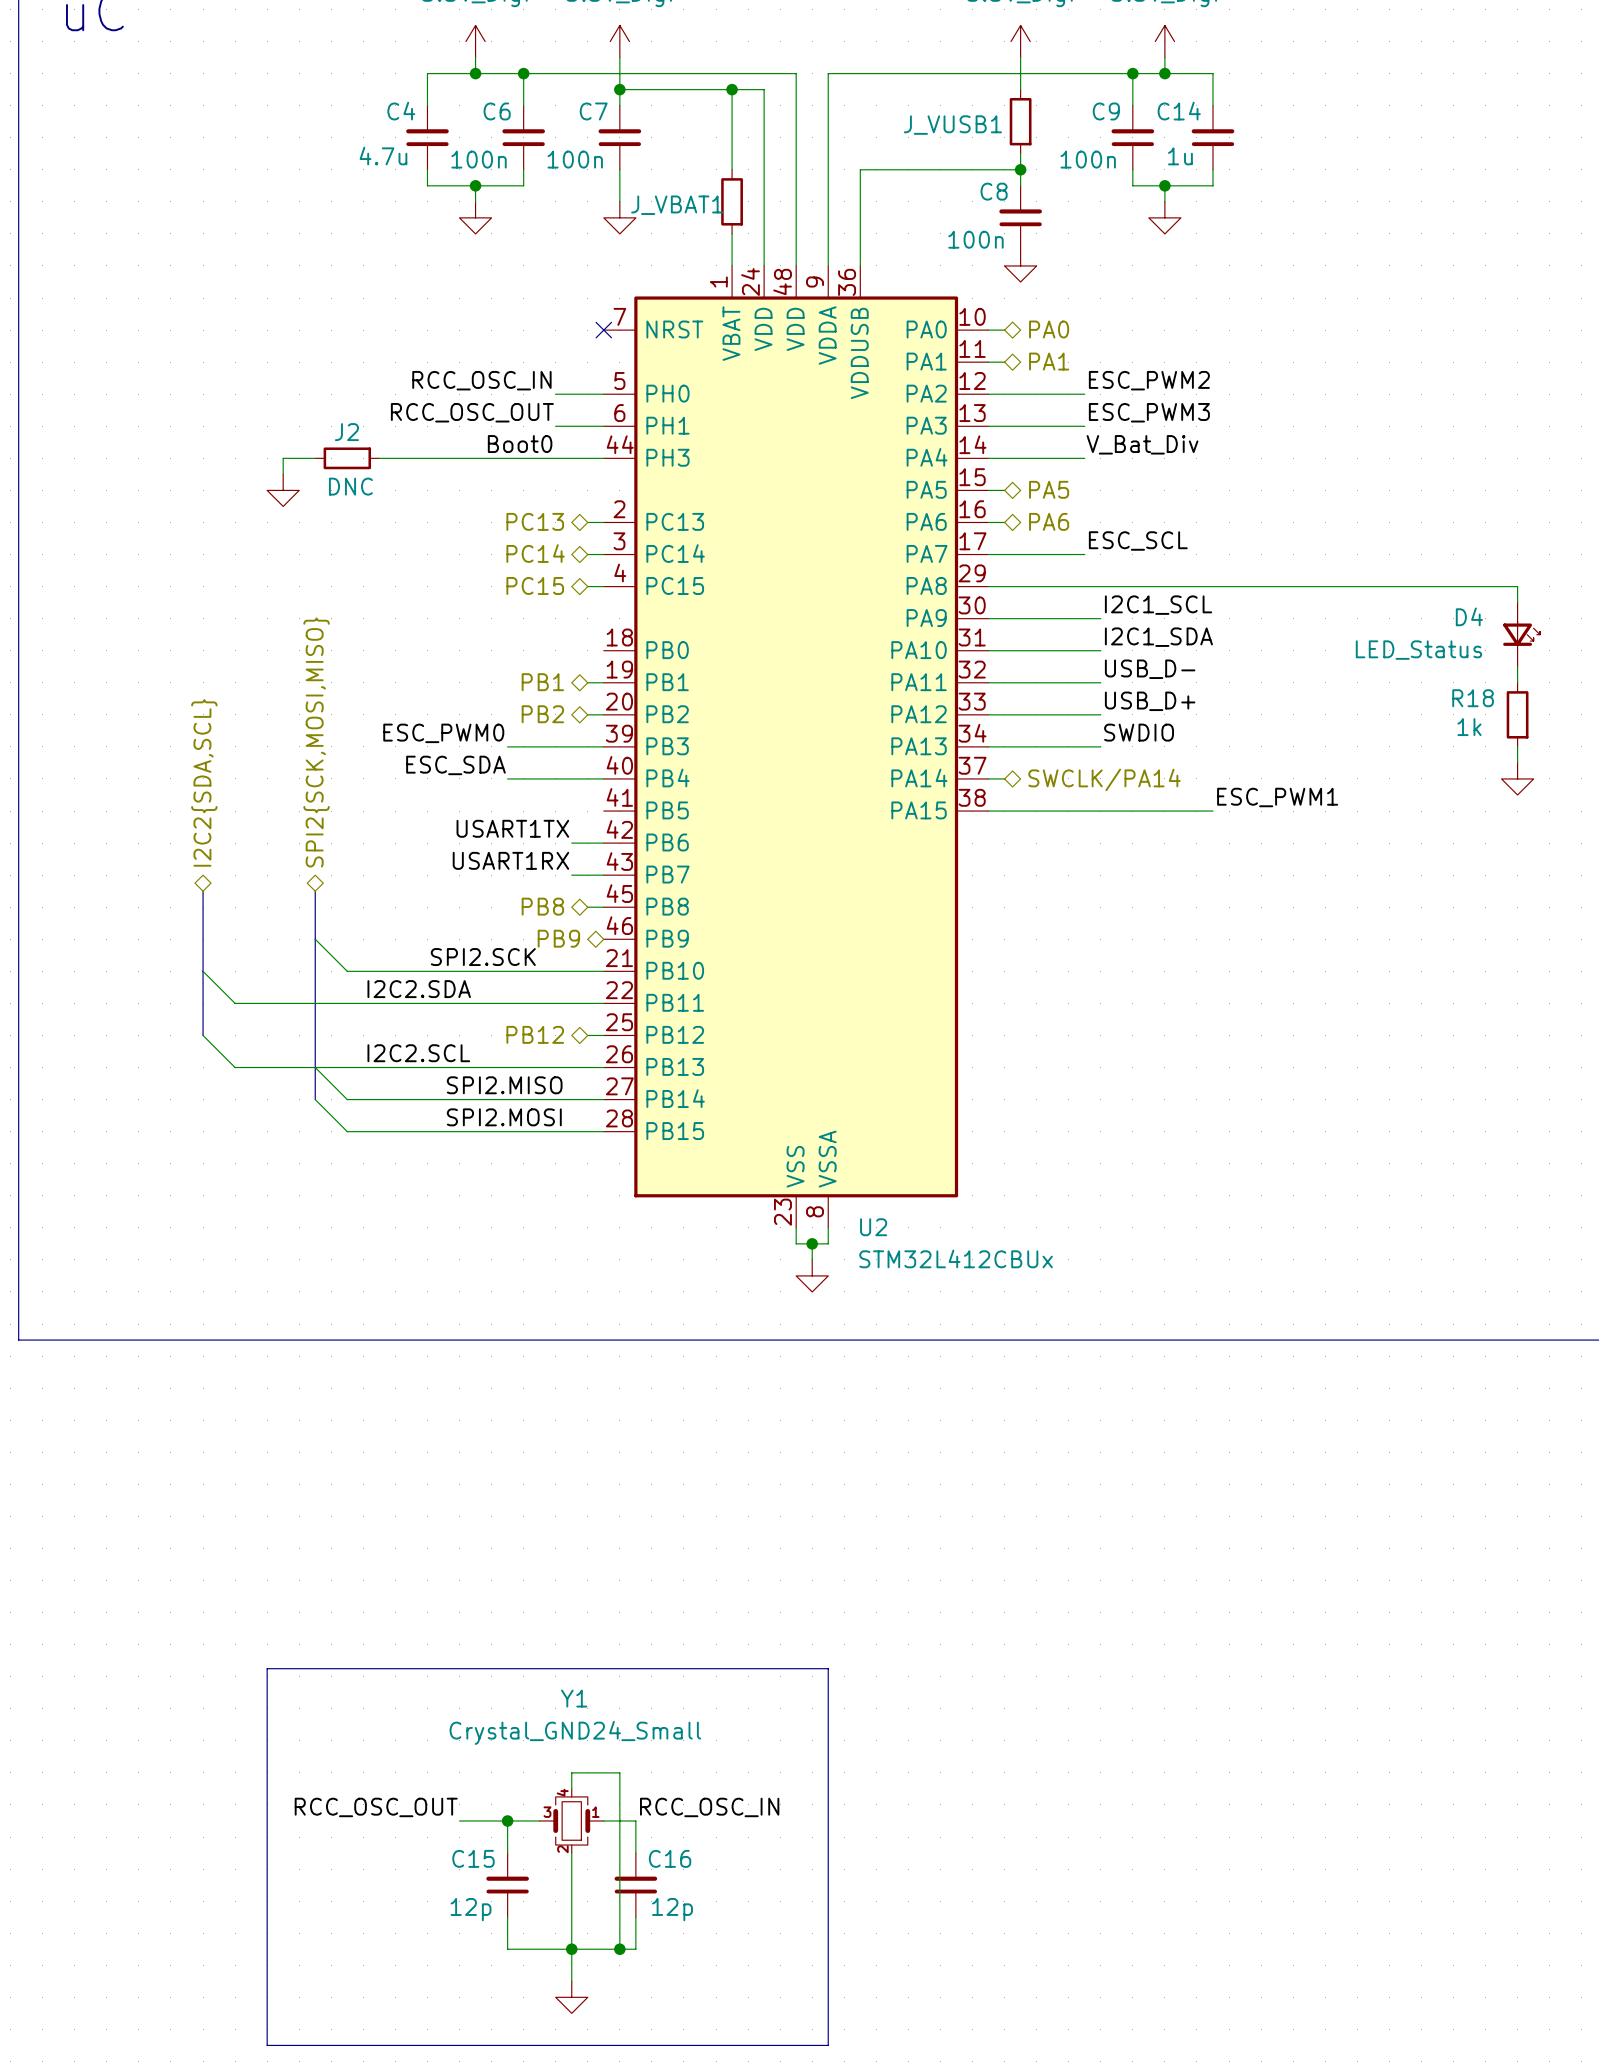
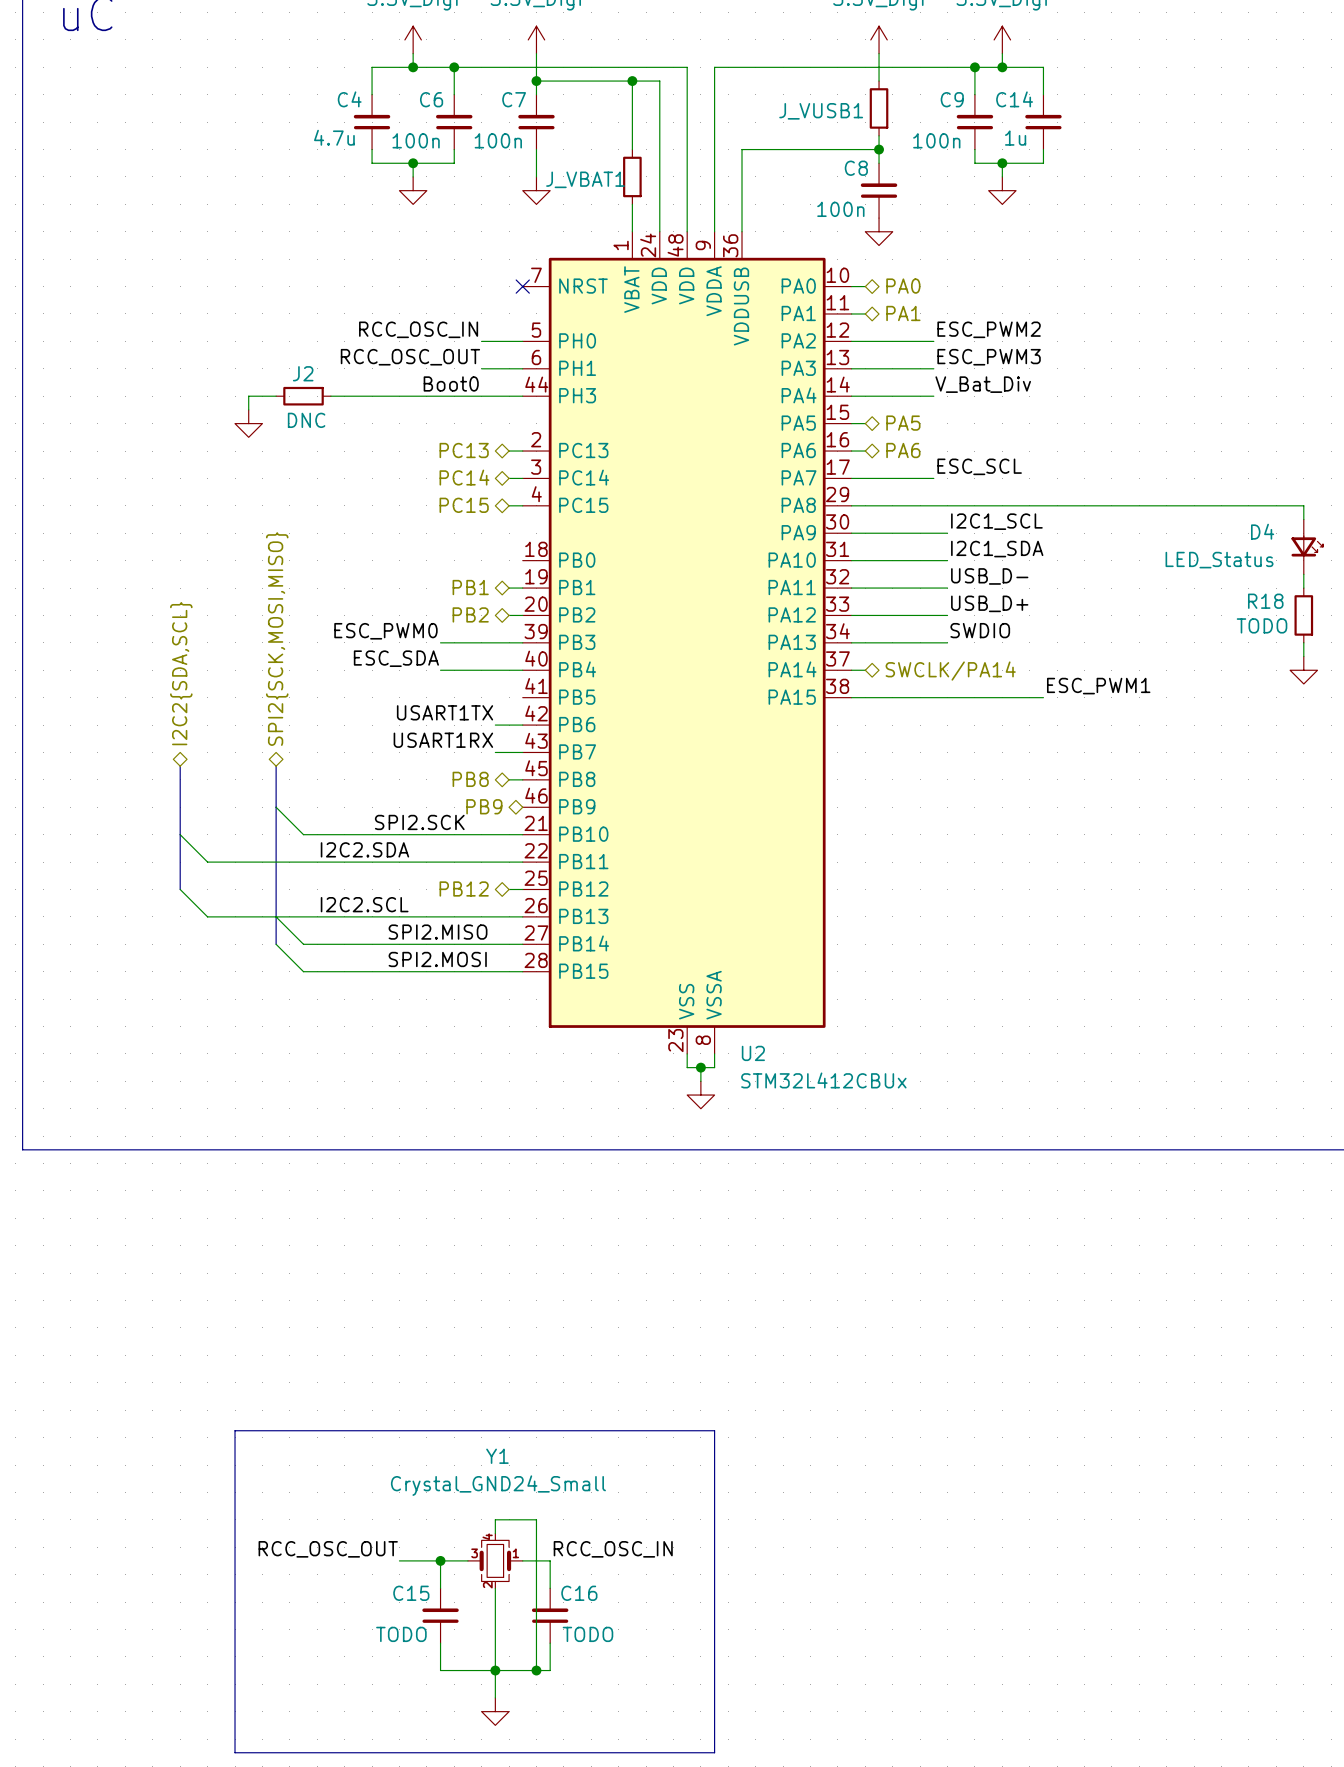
R18 value: 1k (1469, 727) -> TODO (1262, 625)
C15 value: 12p (471, 1909) -> TODO (401, 1634)
C16 value: 12p (672, 1909) -> TODO (587, 1634)

